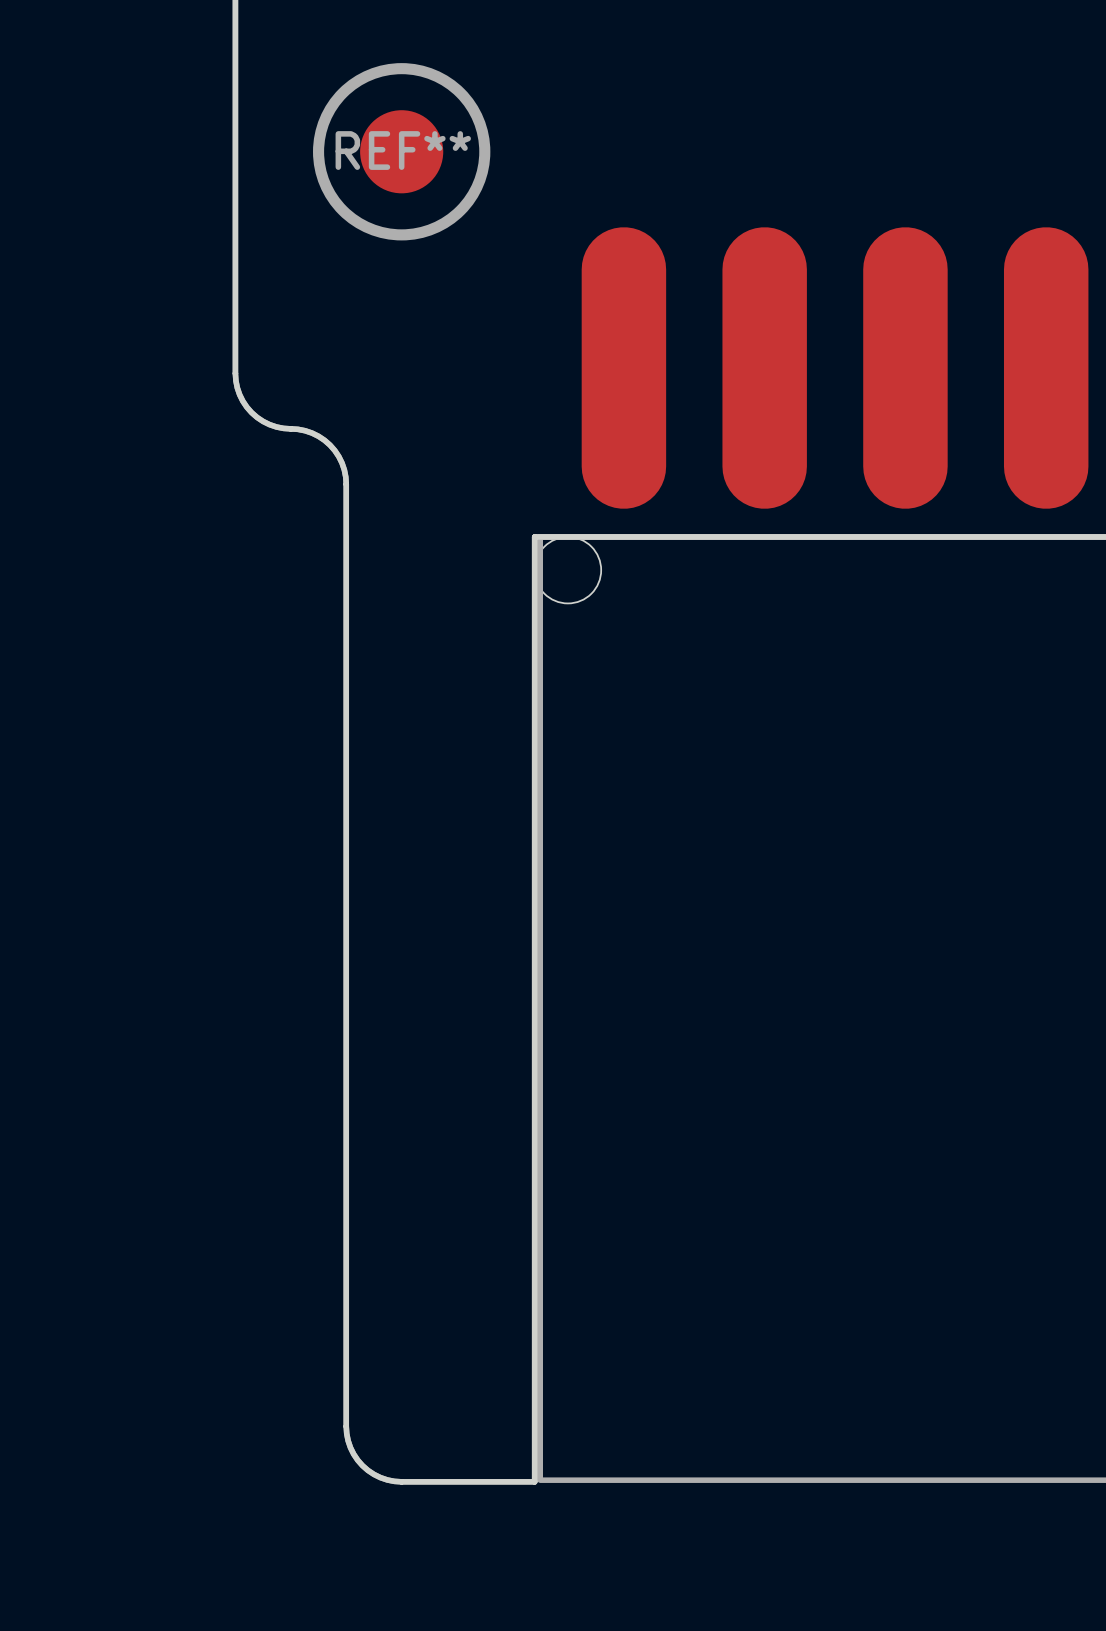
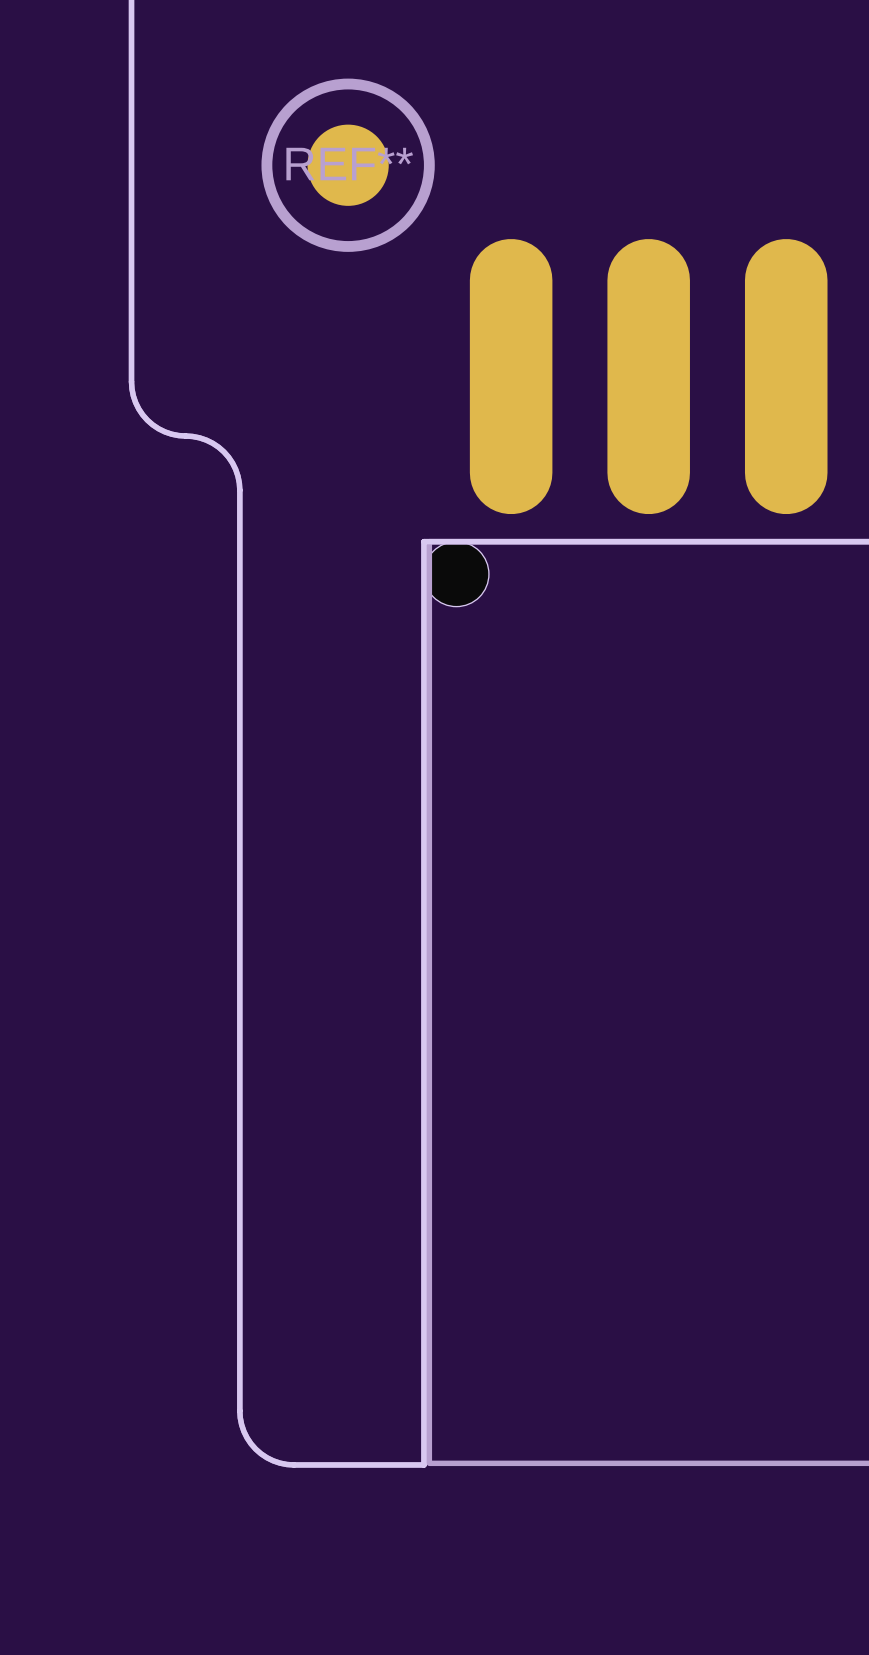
REF** position: (401, 151) -> (348, 165)

